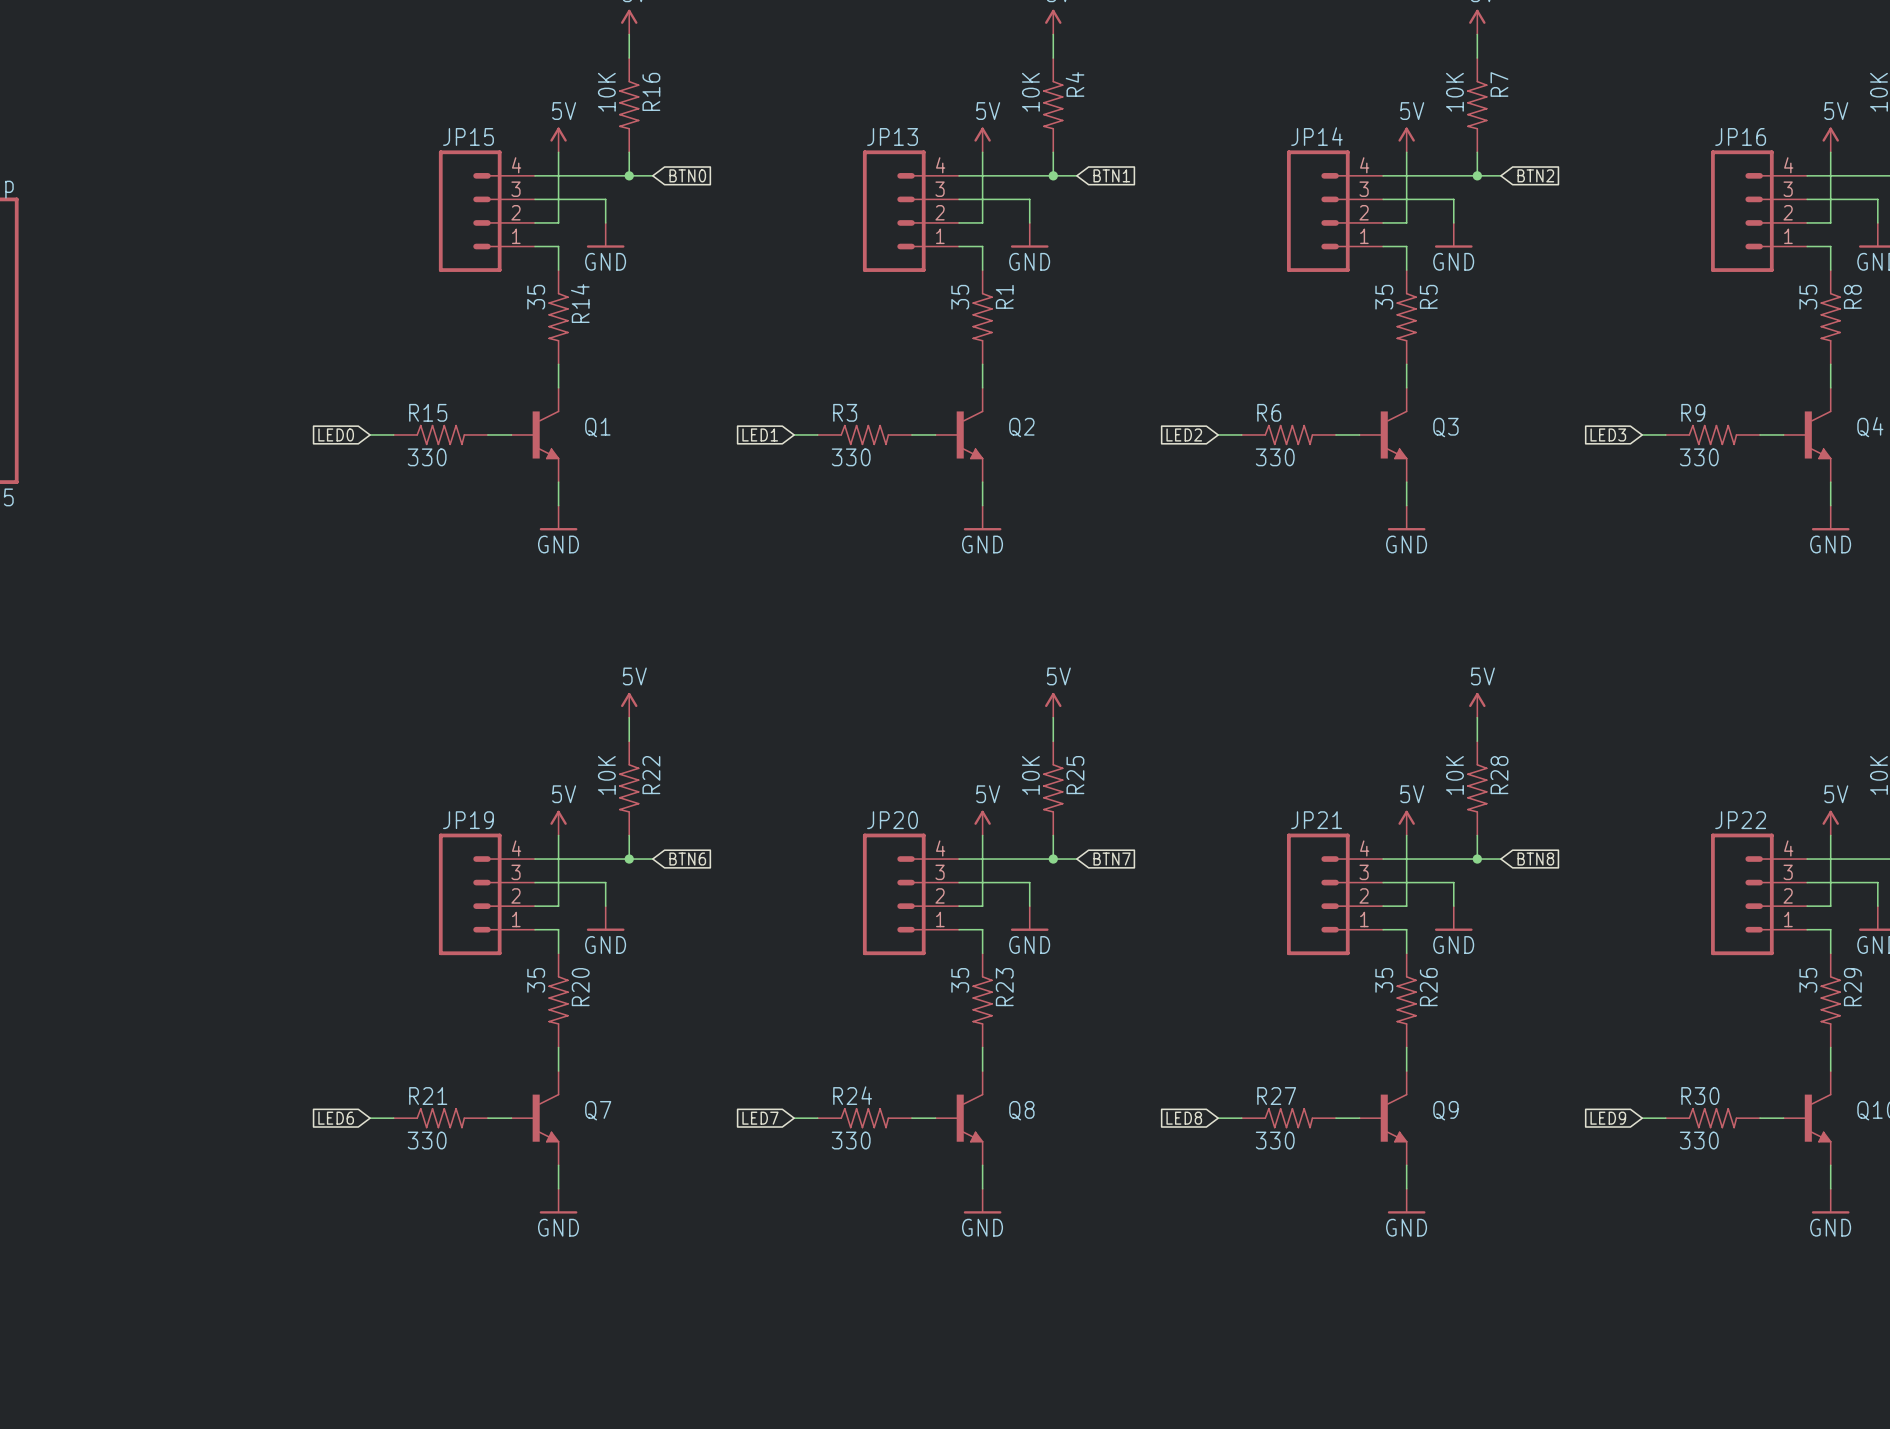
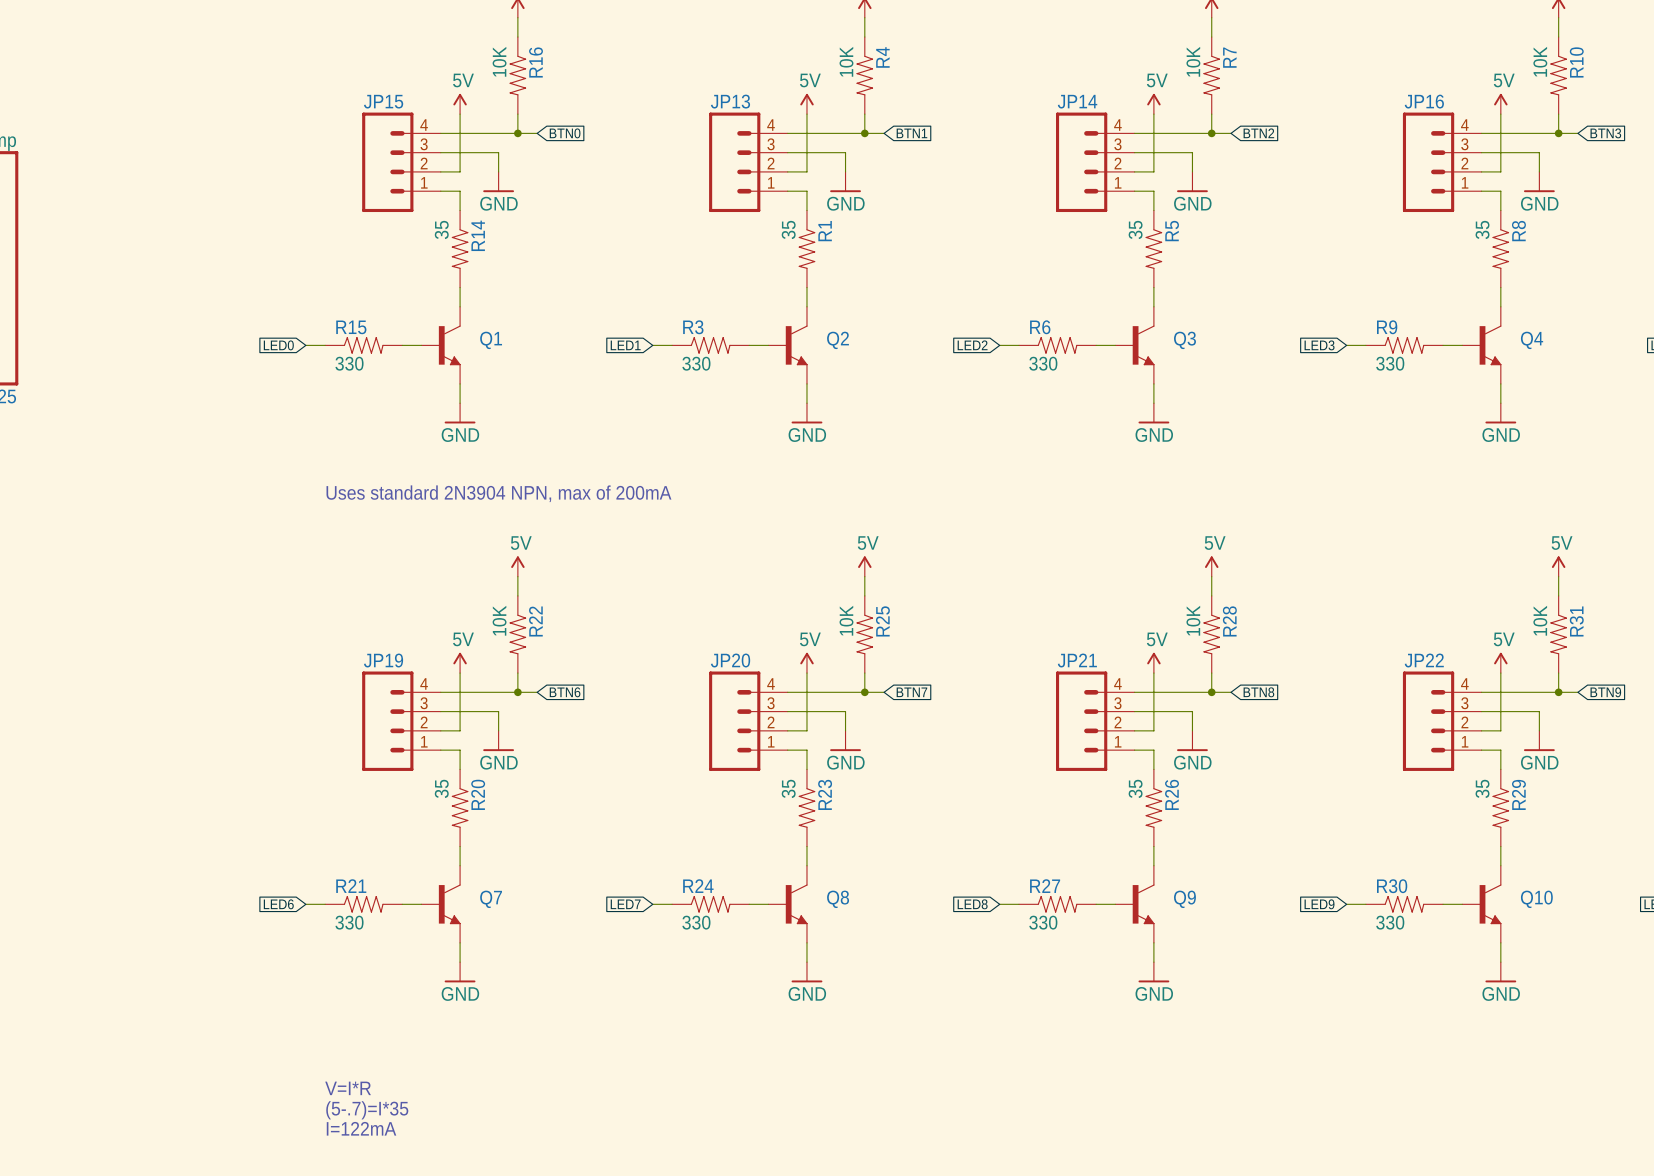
text: none -> Uses standard 2N3904 NPN, max of 200mA (498, 493)
text: none -> V=I*R (348, 1088)
text: none -> (5-.7)=I*35 (367, 1110)
text: none -> I=122mA (361, 1128)

